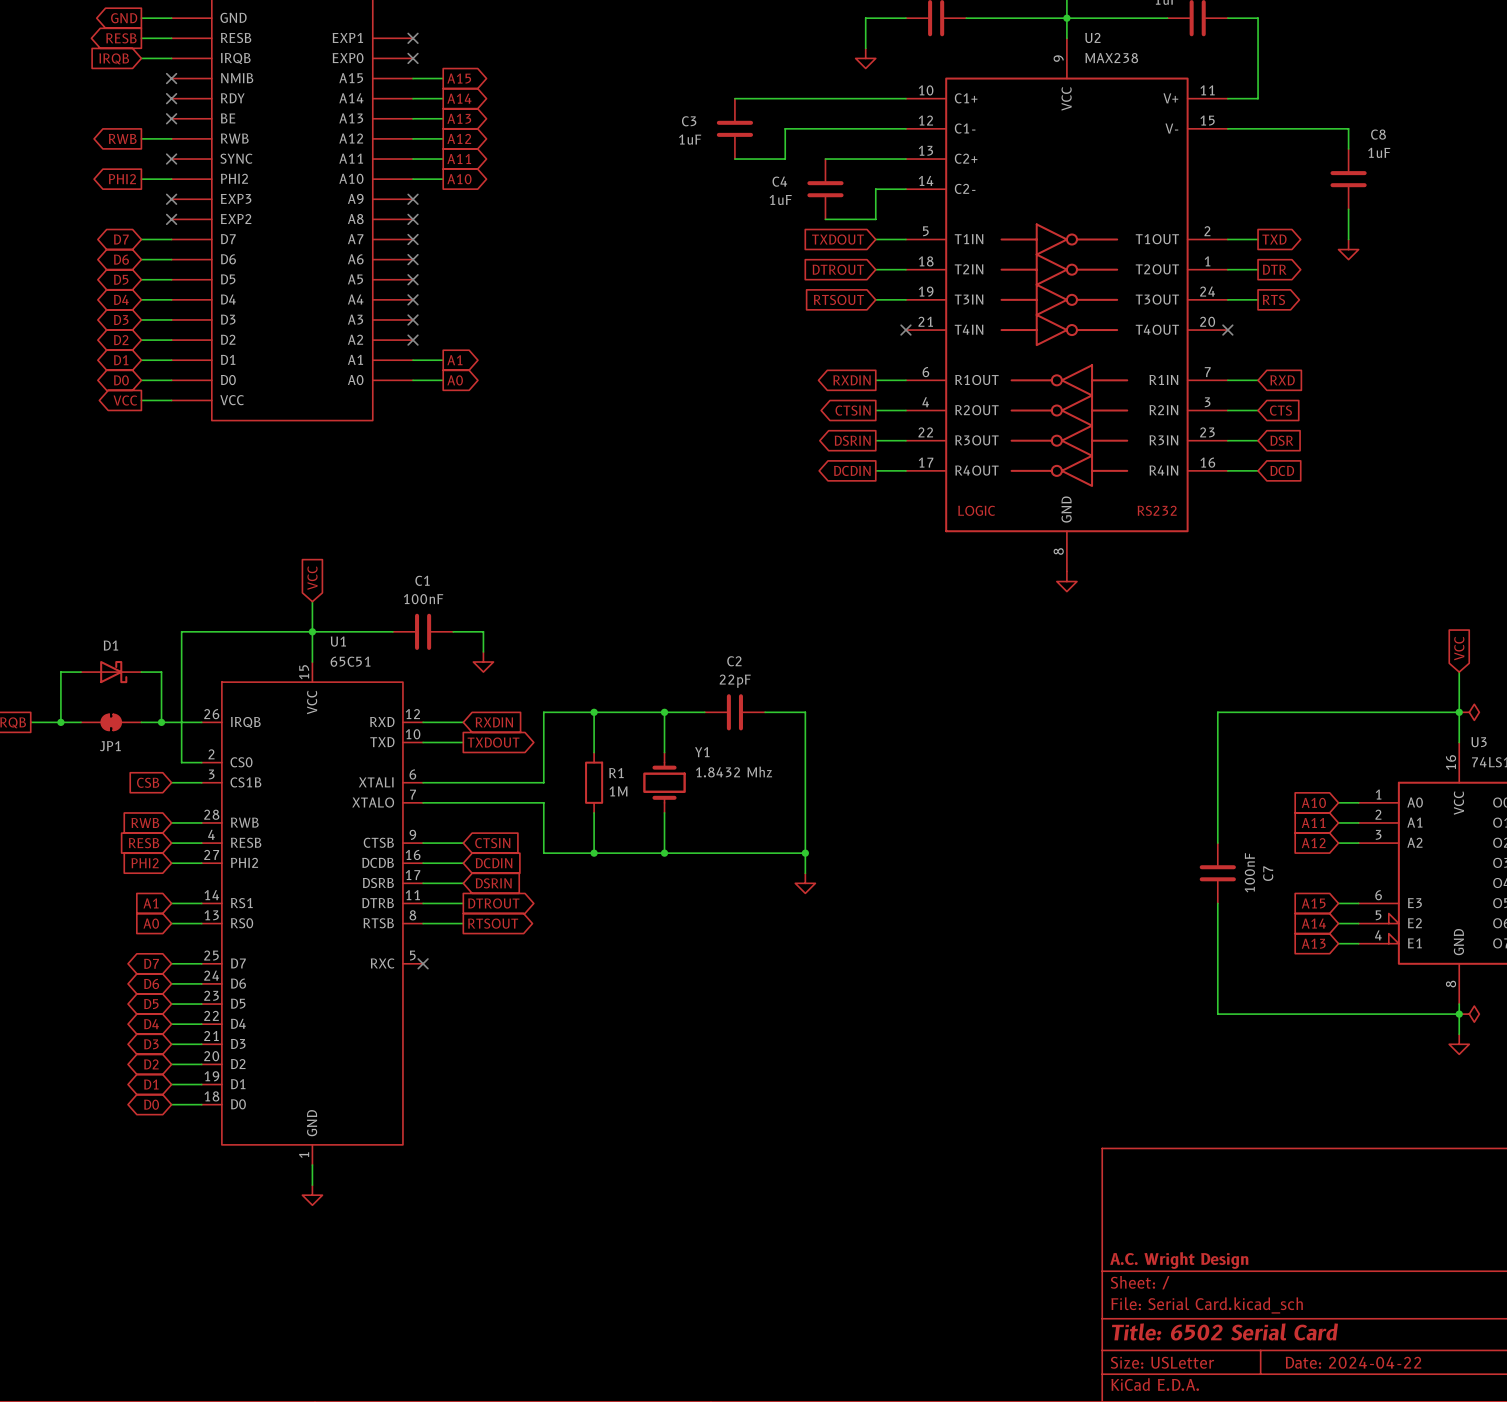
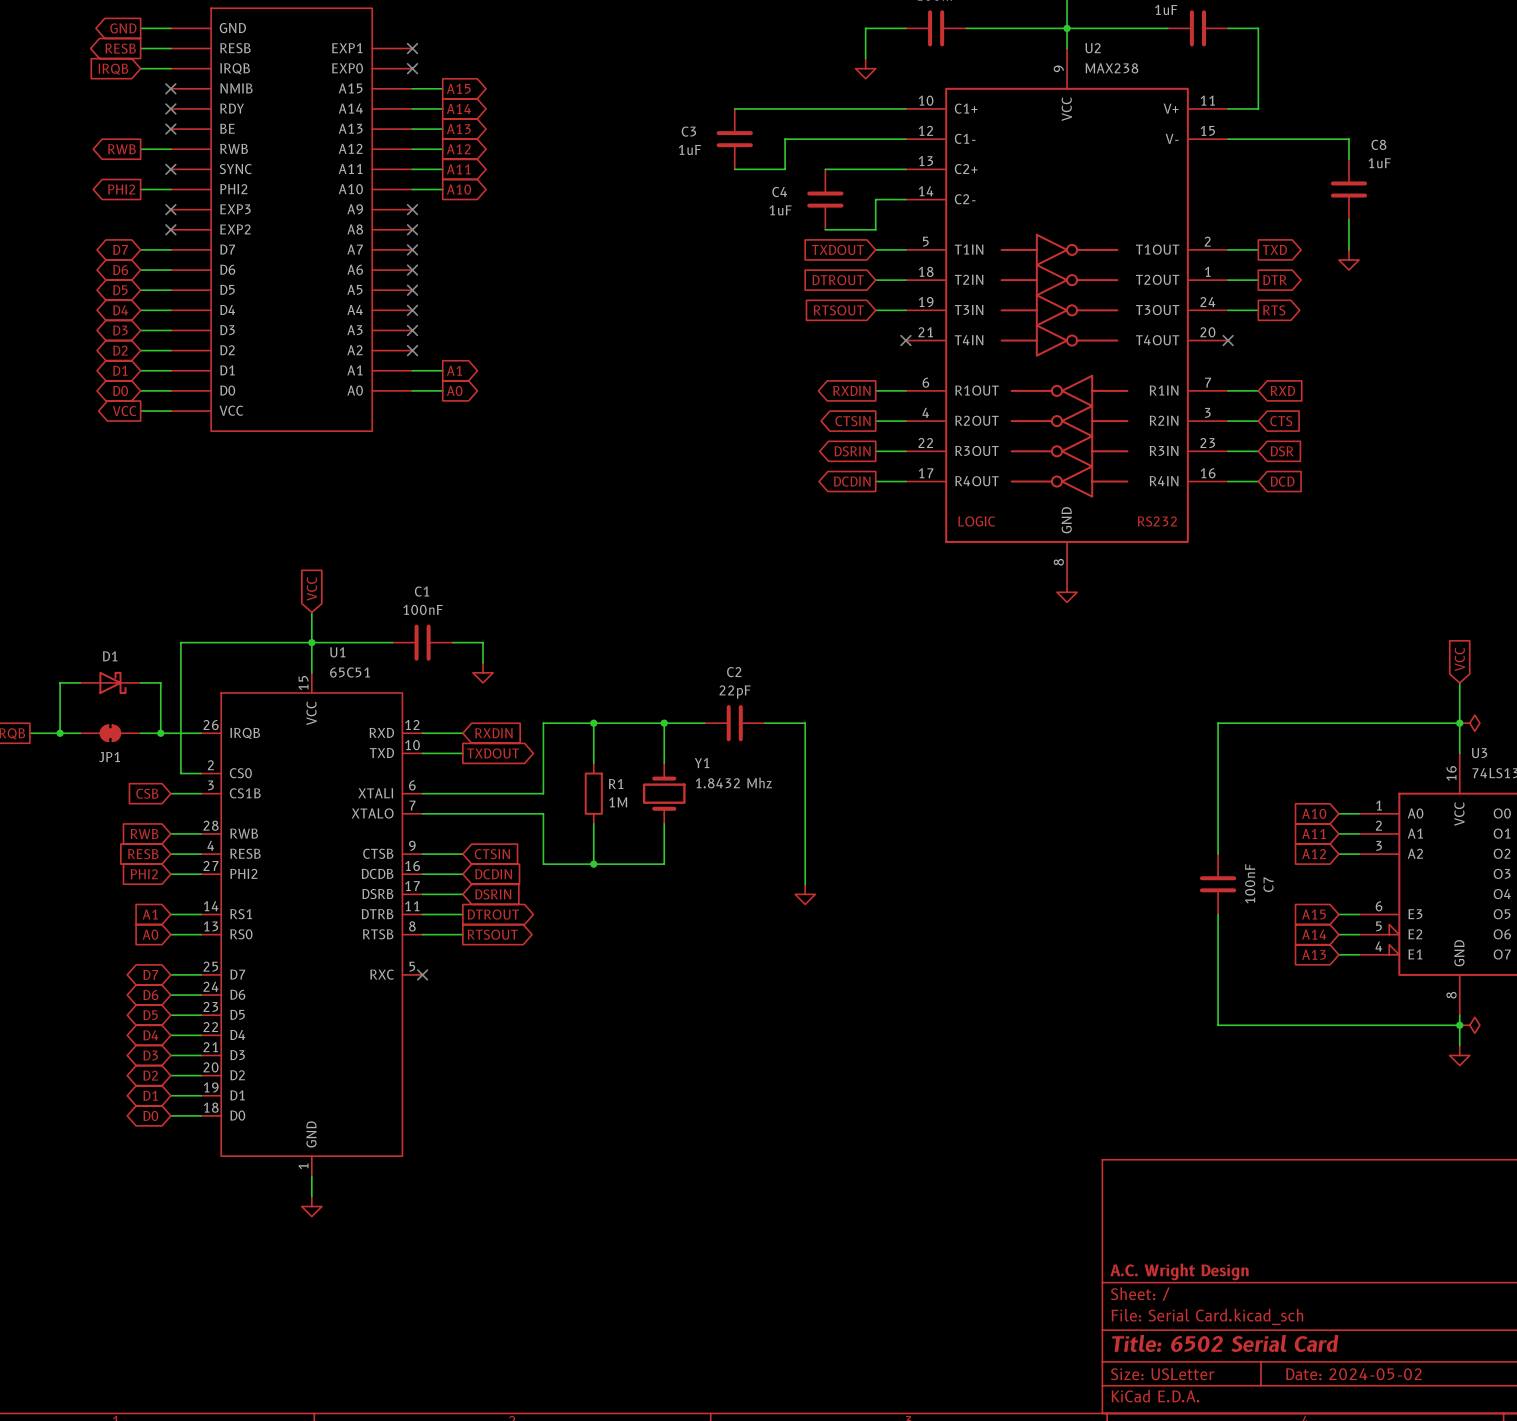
wire: (664, 853) (805, 853) -> none
junction: (664, 853) -> none
junction: (805, 853) -> none
title block: Date: 2024-04-22 (1353, 1362) -> Date: 2024-05-02 (1353, 1374)

